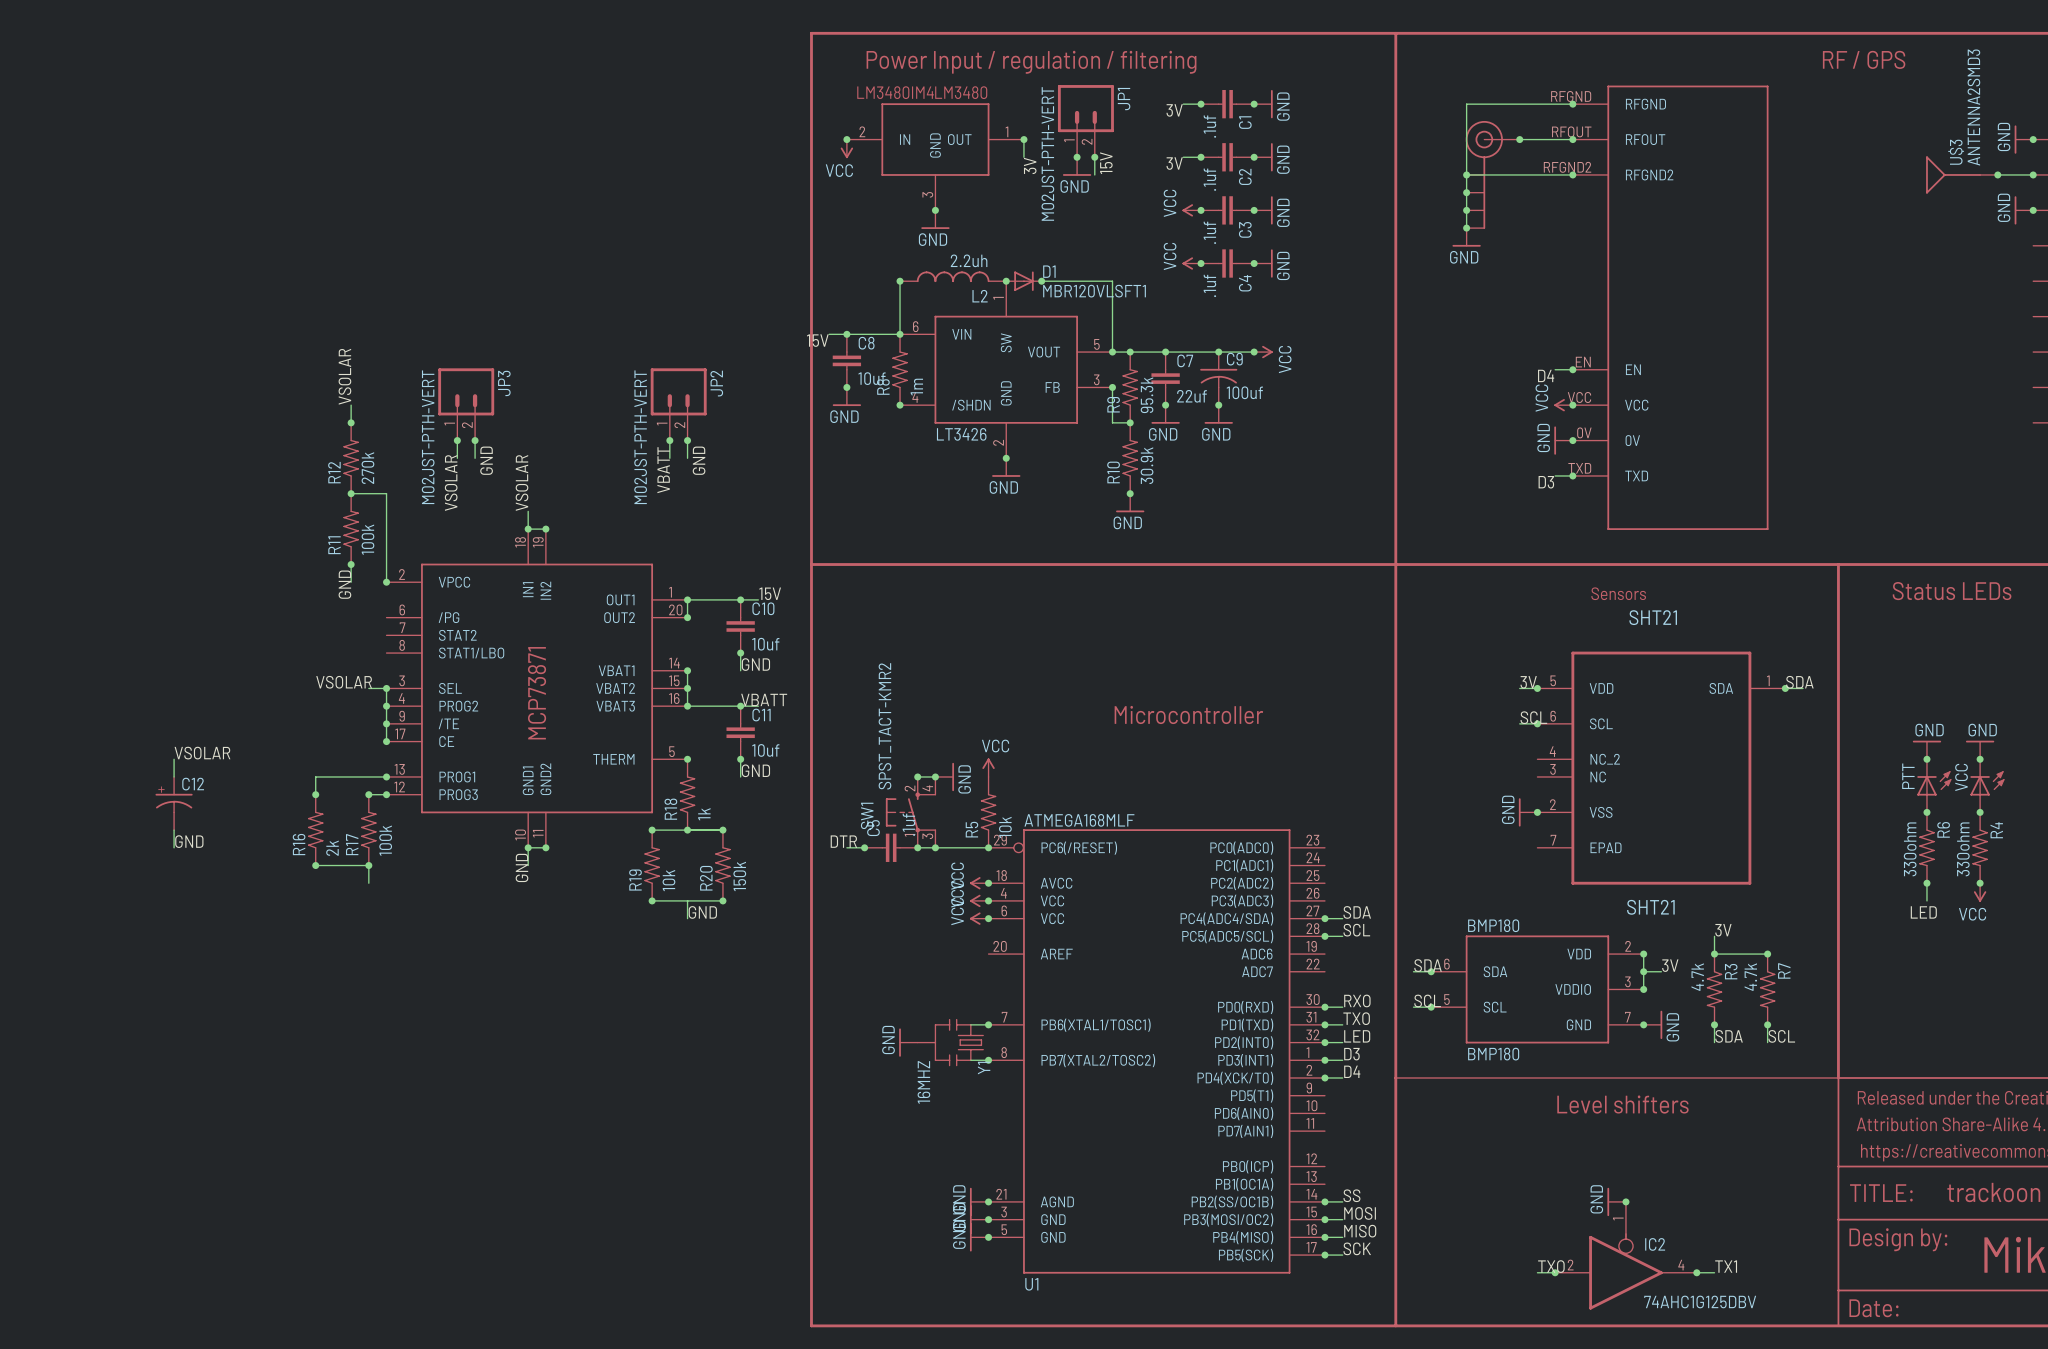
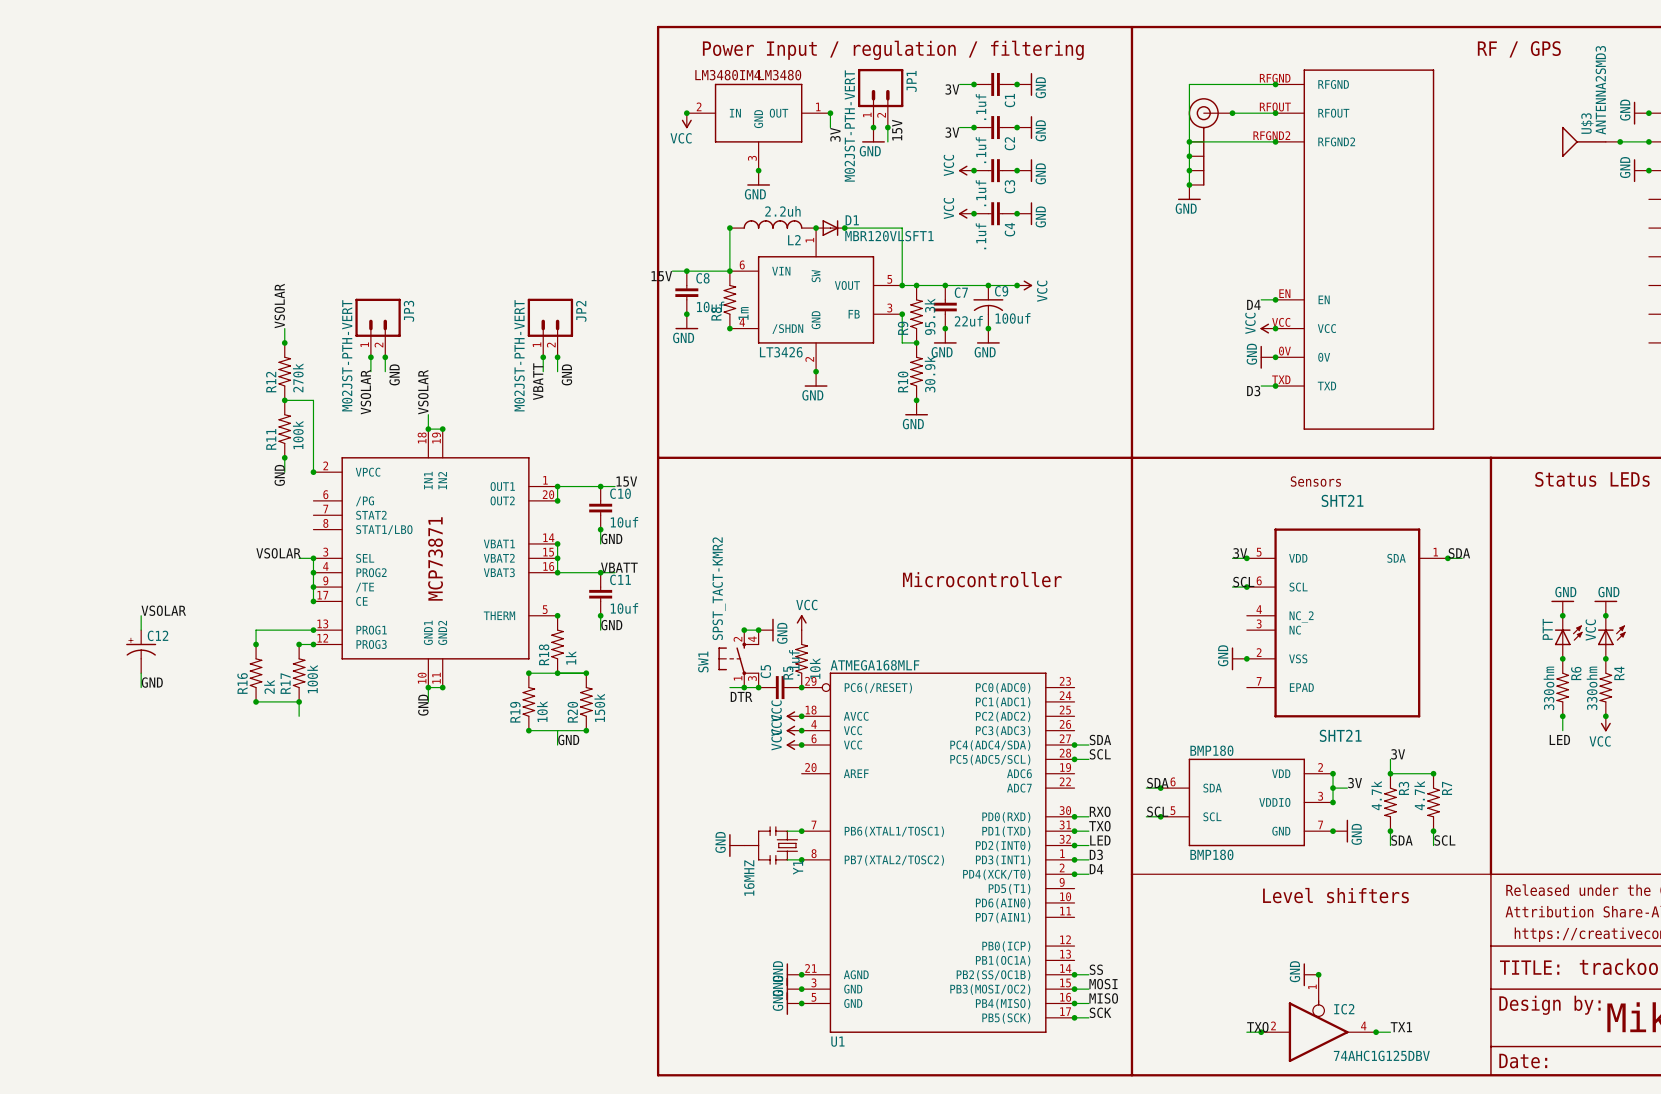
label position: DTR (843, 841) -> DTR (741, 696)
junction: (864, 847) -> none
C5 position: (891, 847) -> (780, 687)

